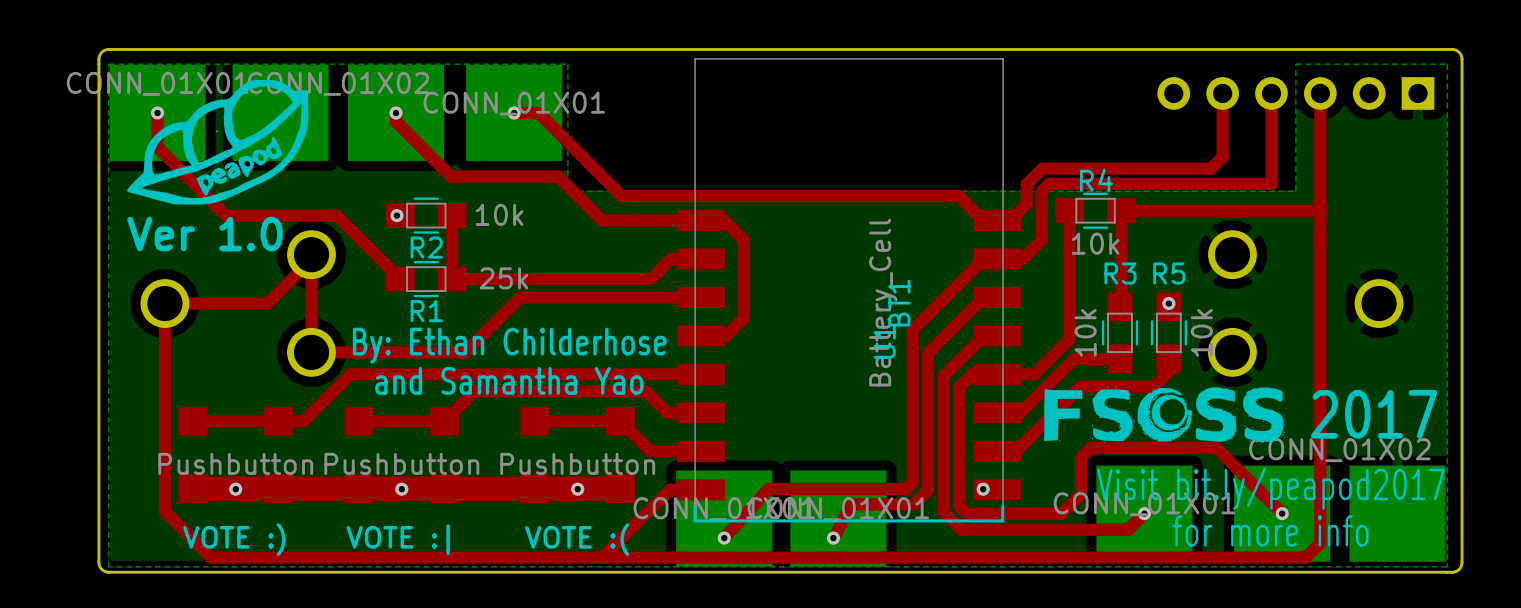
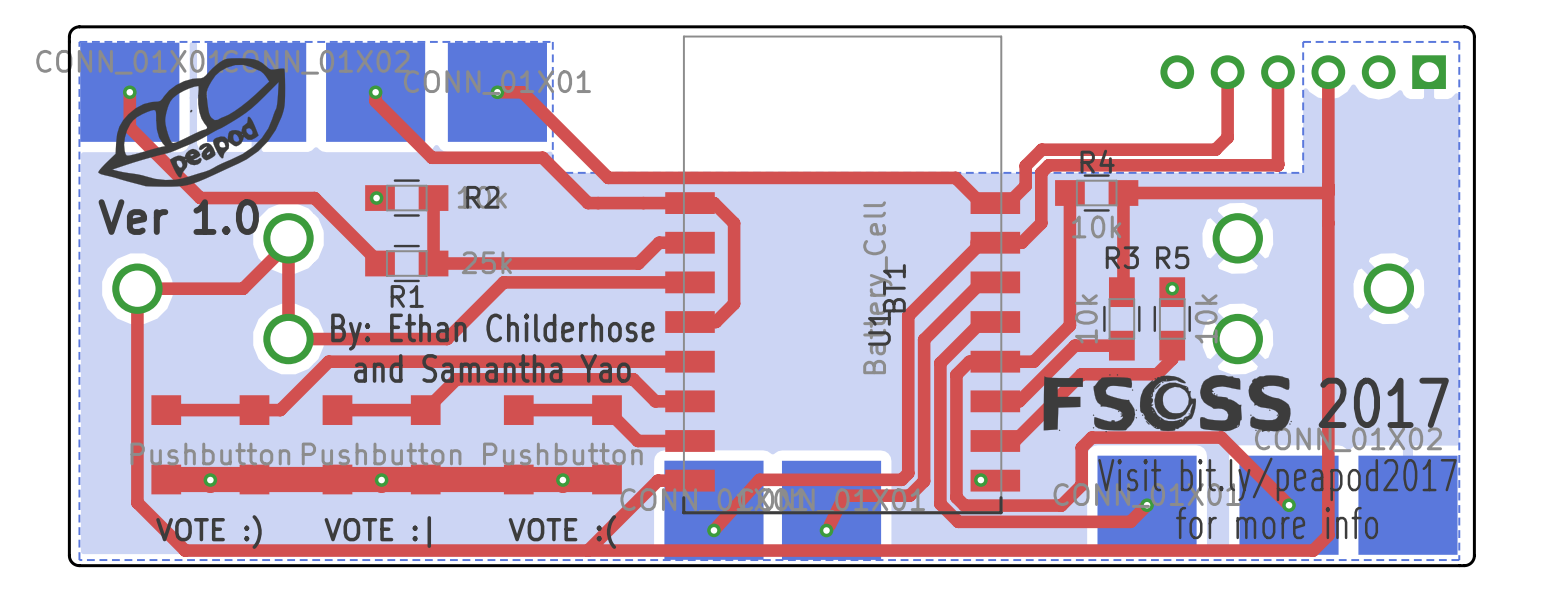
R2 name position: R2 (426, 247) -> R2 (482, 197)

